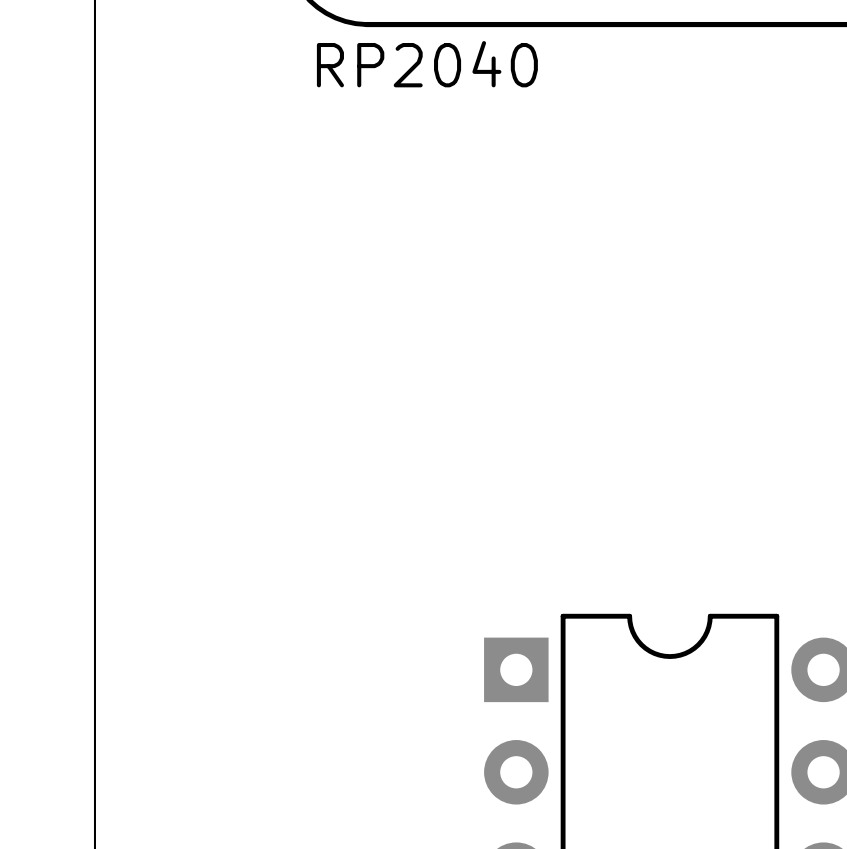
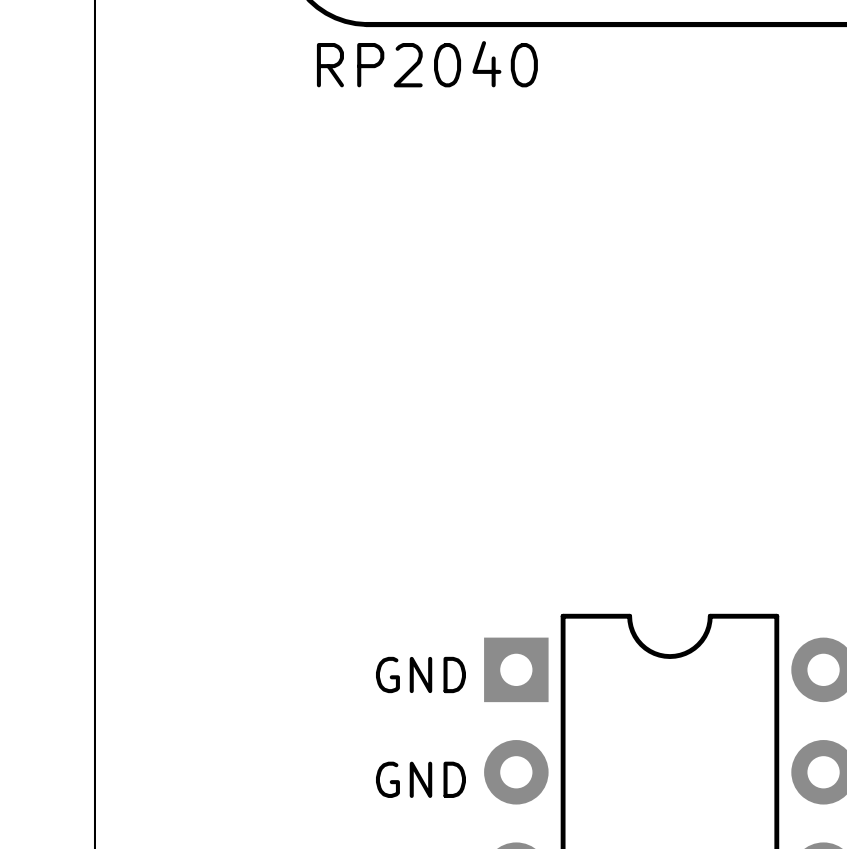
text: none -> GND (420, 674)
text: none -> GND (420, 779)

